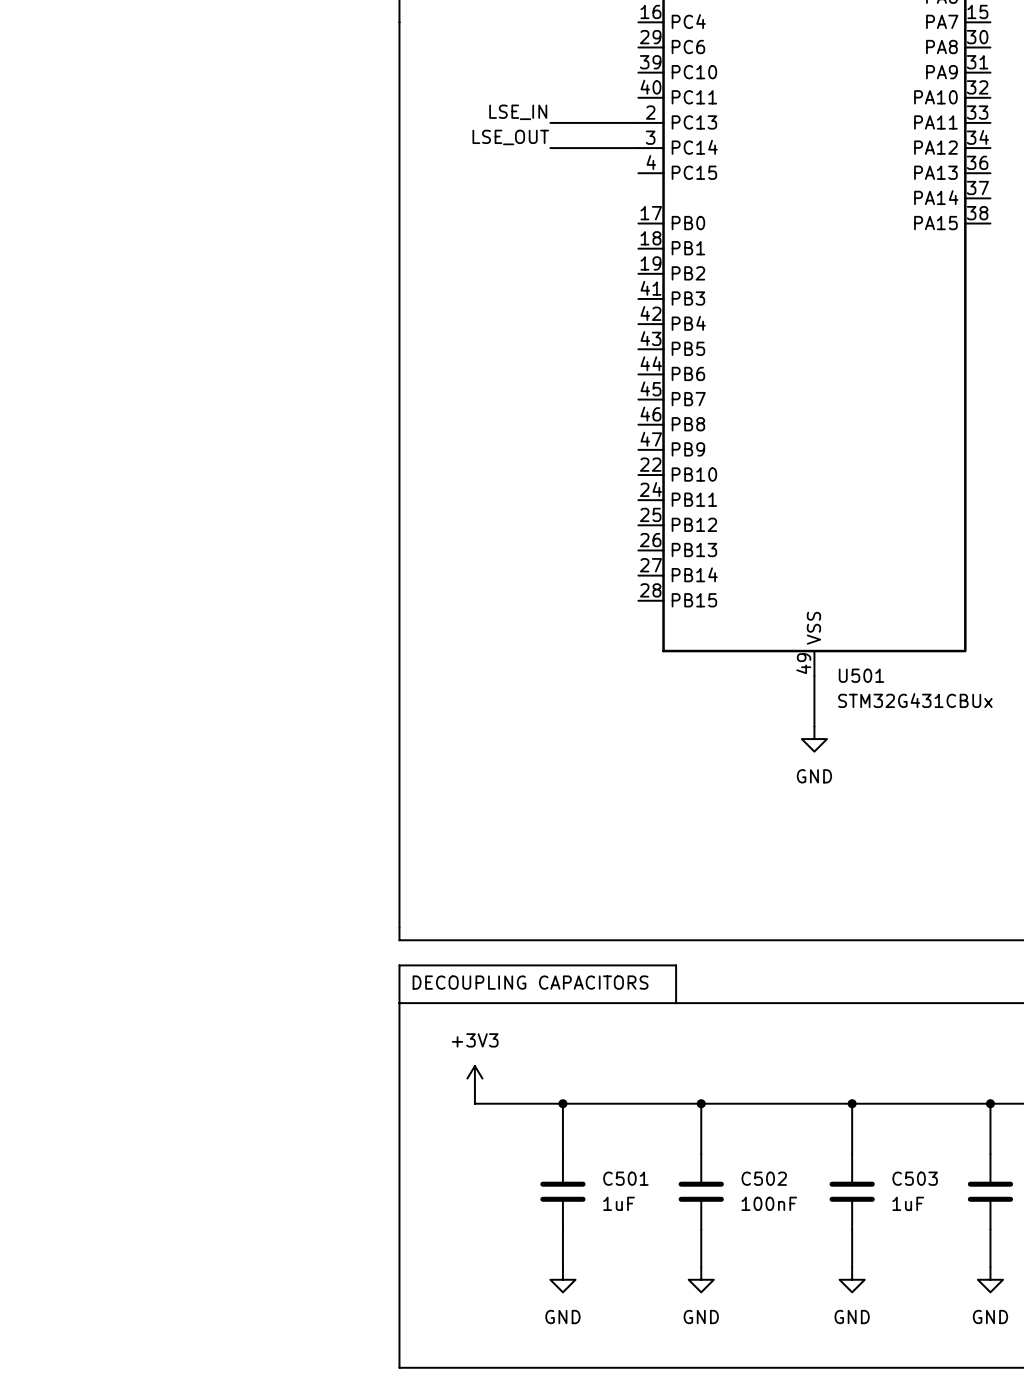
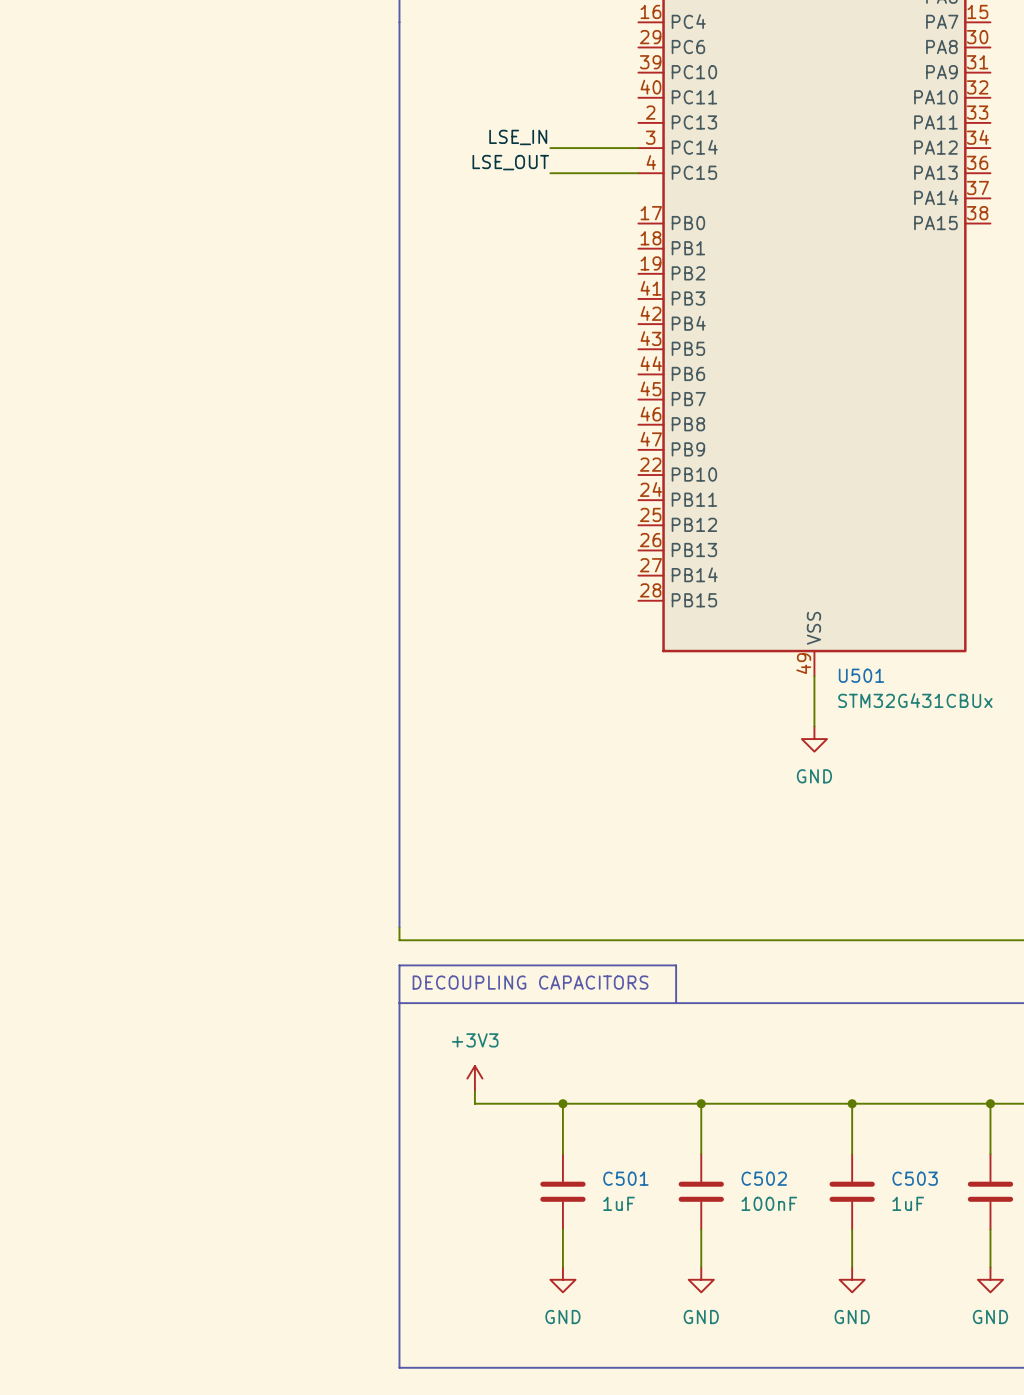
label: LSE_IN (518, 112) -> none
wire: (550, 122) (638, 122) -> (550, 173) (638, 173)
label: LSE_OUT (510, 137) -> LSE_IN (518, 137)
label: none -> LSE_OUT (510, 162)

